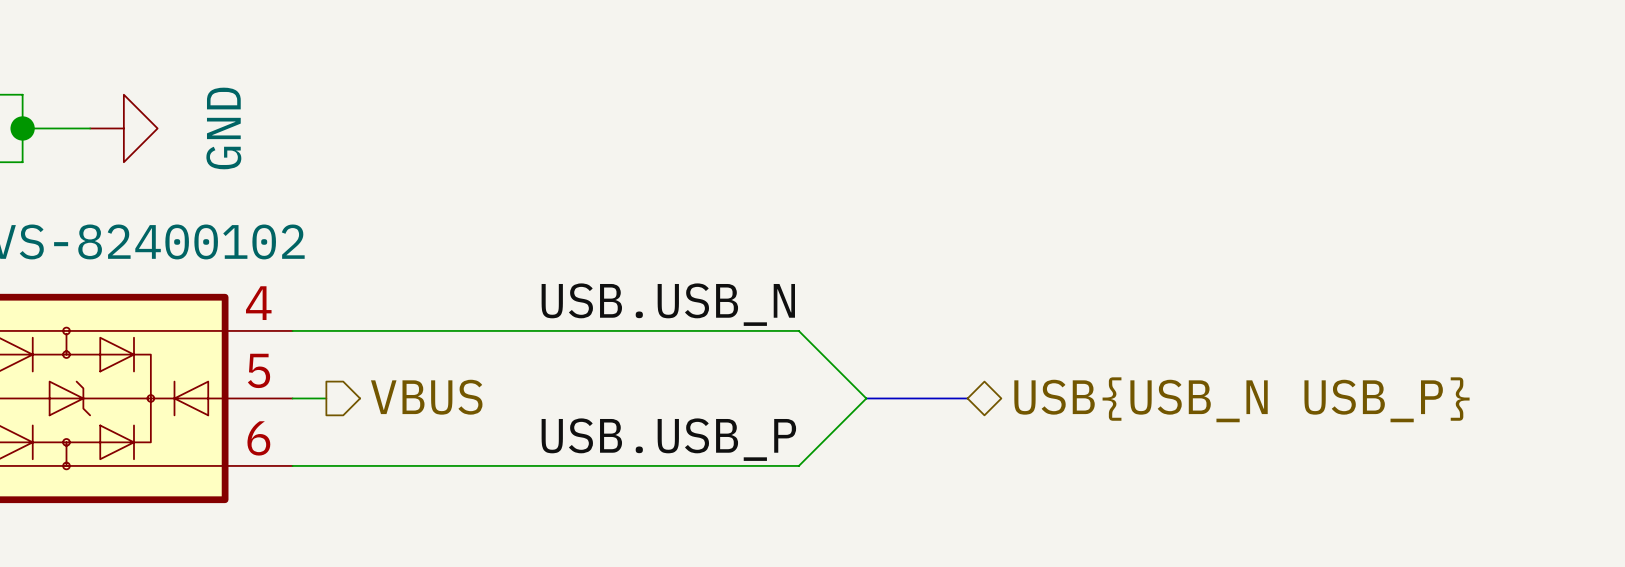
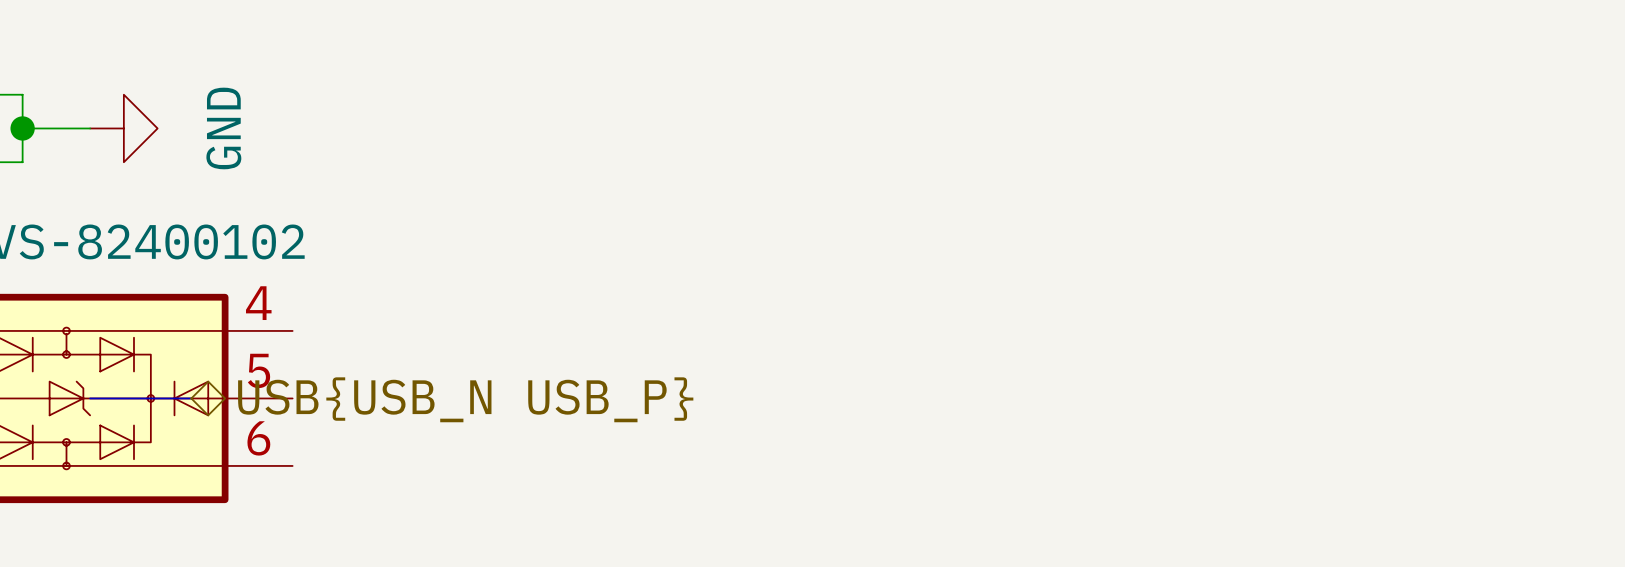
label: USB.USB_N (668, 304) -> none
wire: (292, 330) (798, 330) (866, 398) (798, 465) (292, 465) -> none
hierarchical label: VBUS (426, 397) -> none
bus: none -> (90, 398) (191, 398)
wire: (292, 398) (326, 398) -> none
bus: (866, 398) (967, 398) -> none
hierarchical label: none -> USB{USB_N USB_P} (465, 399)
hierarchical label: USB{USB_N USB_P} (1241, 399) -> none
label: USB.USB_P (668, 439) -> none

